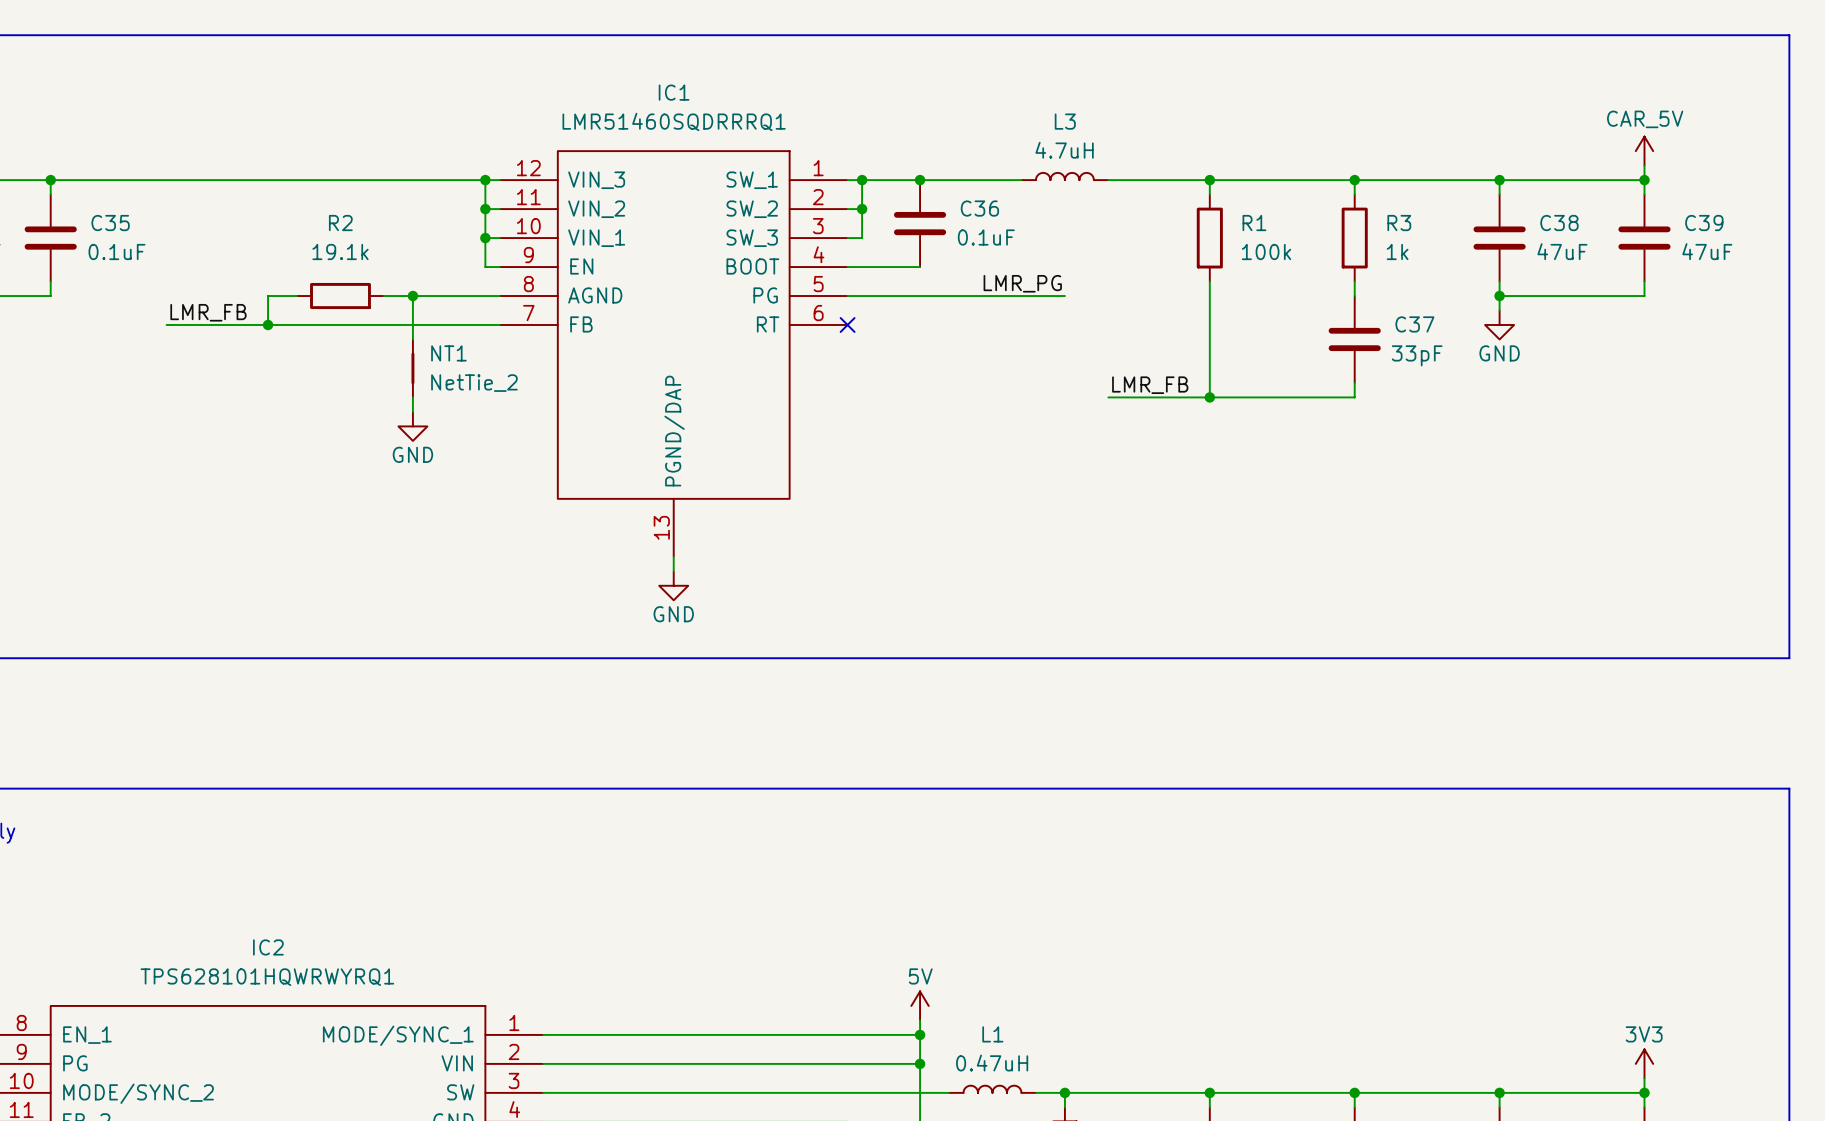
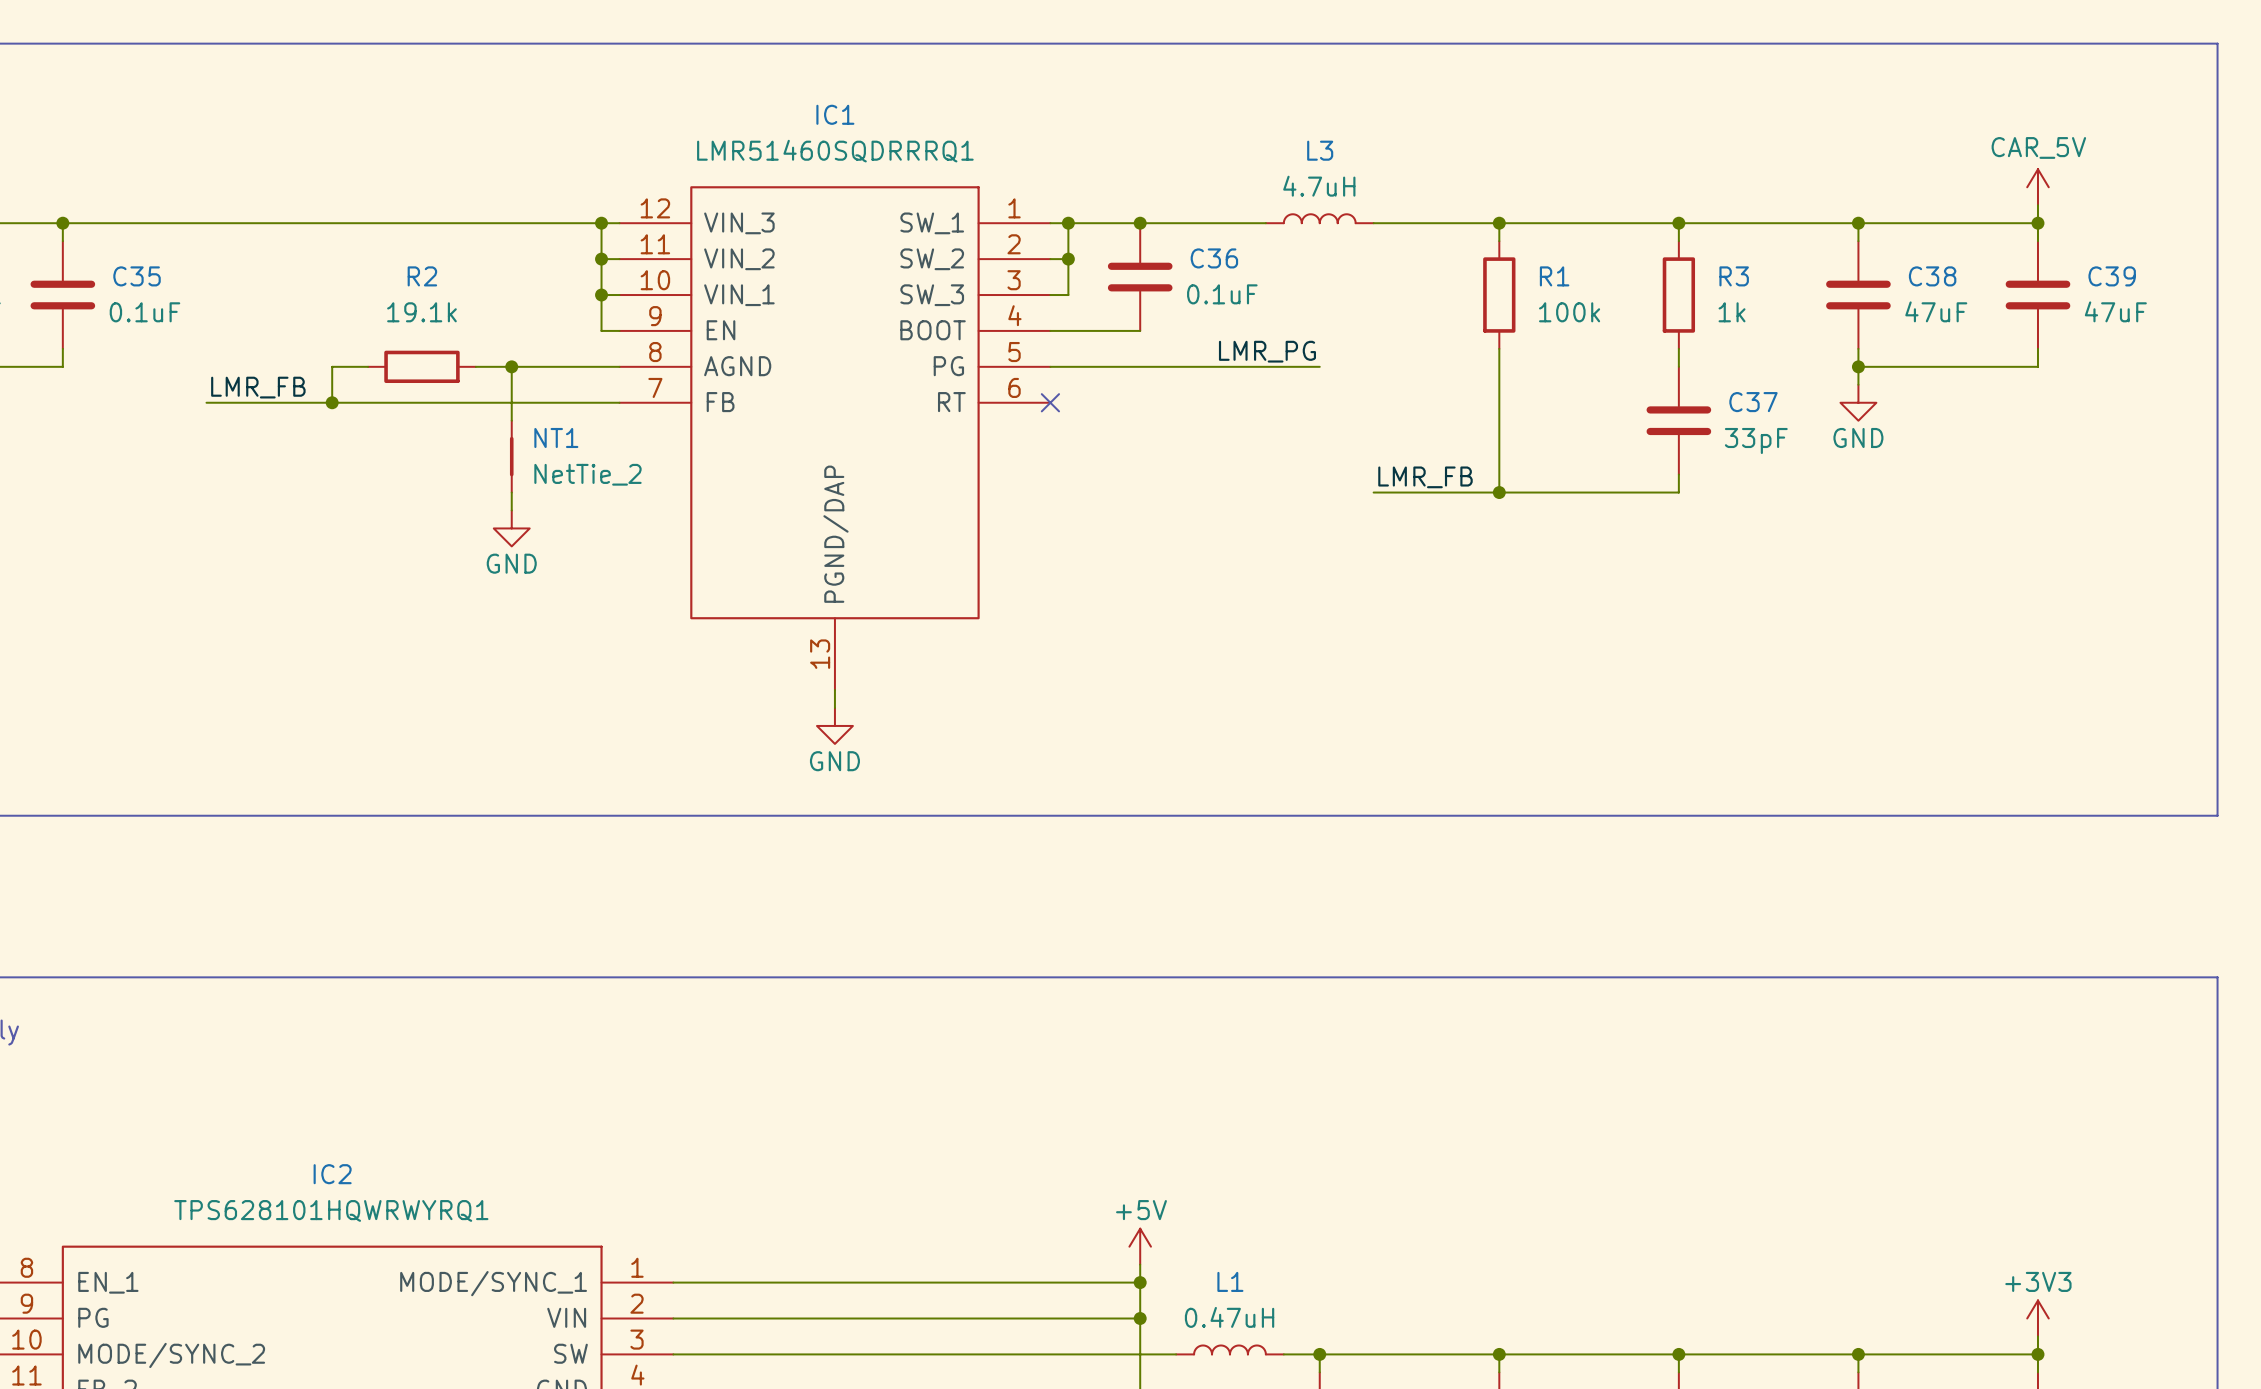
power symbol: 5V (920, 1005) -> +5V (1140, 1246)
power symbol: 3V3 (1644, 1063) -> +3V3 (2037, 1318)

